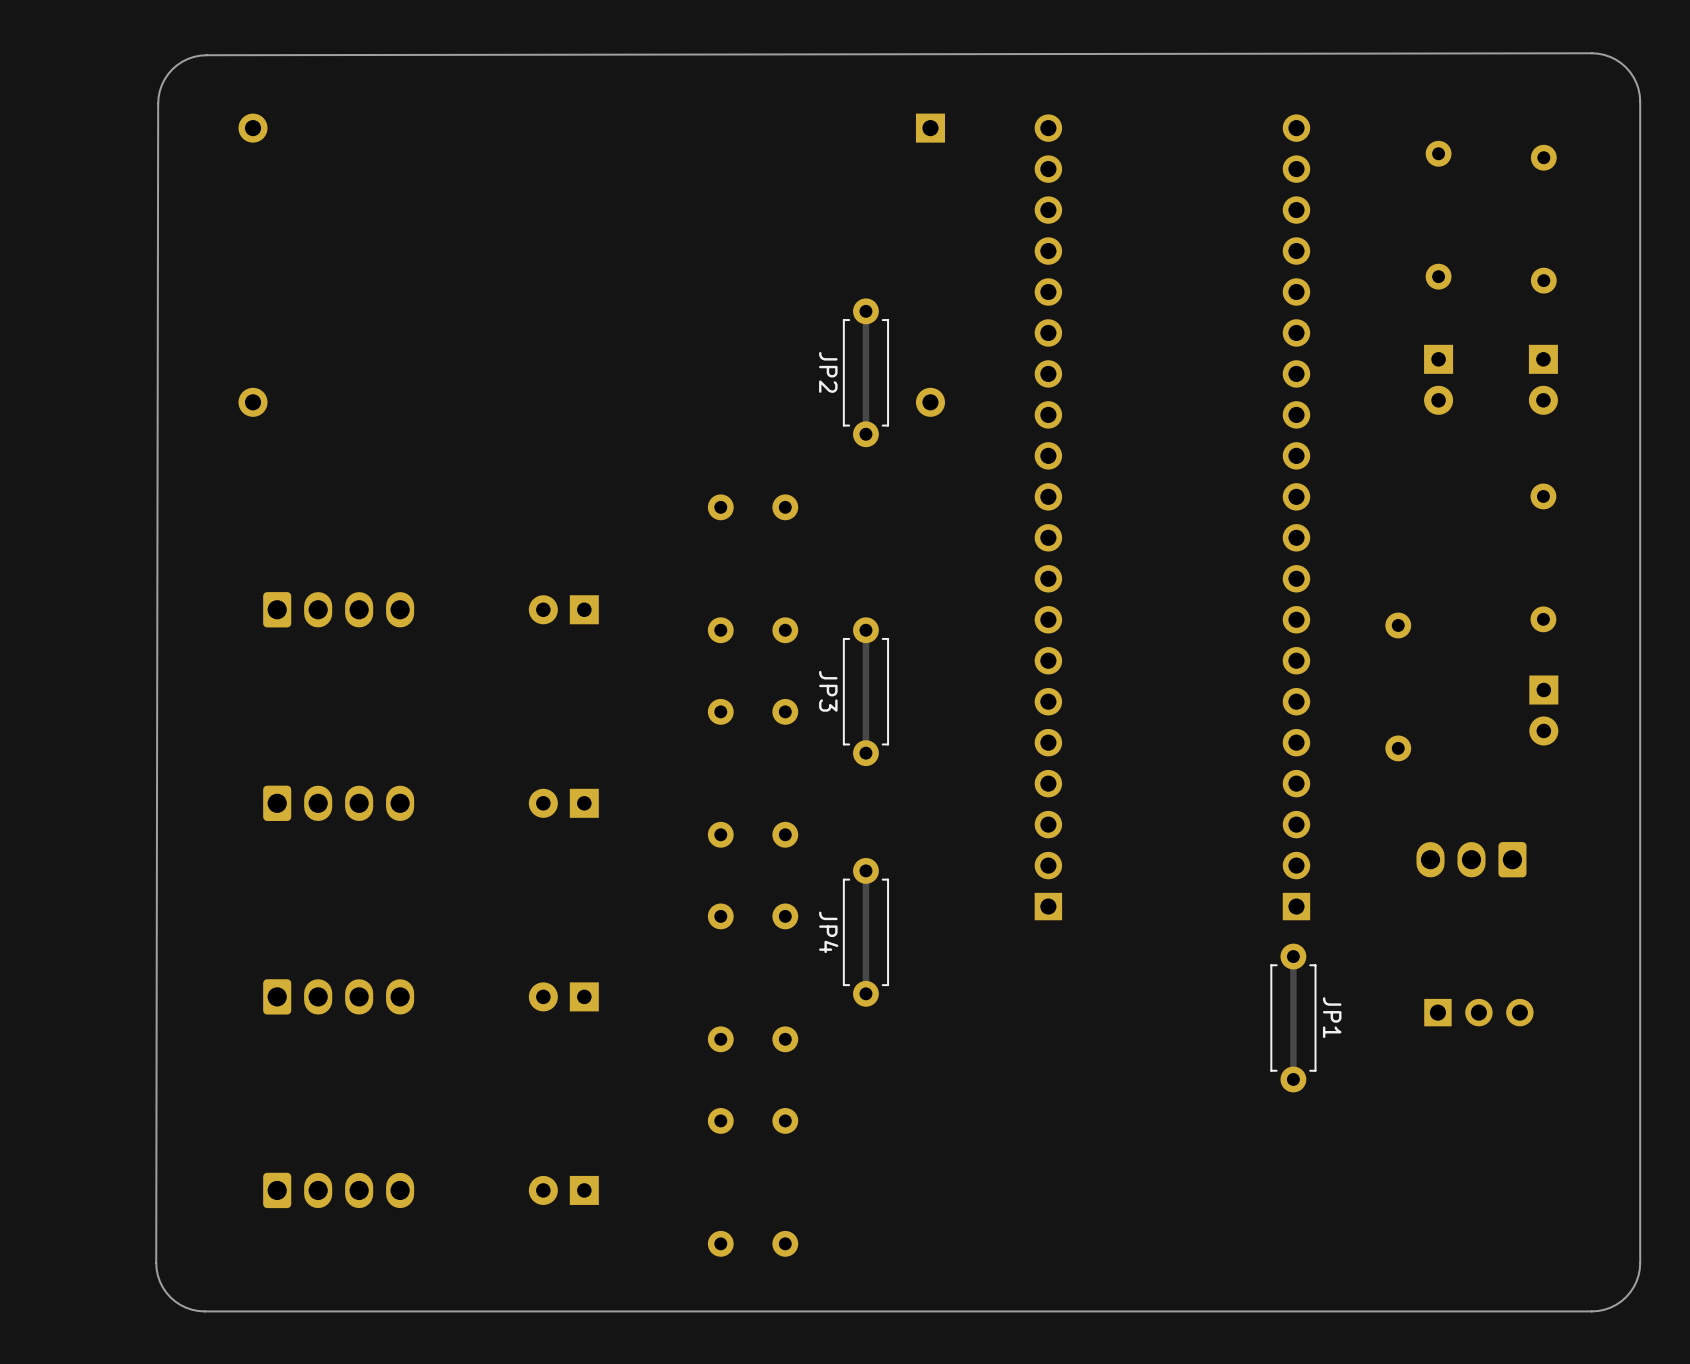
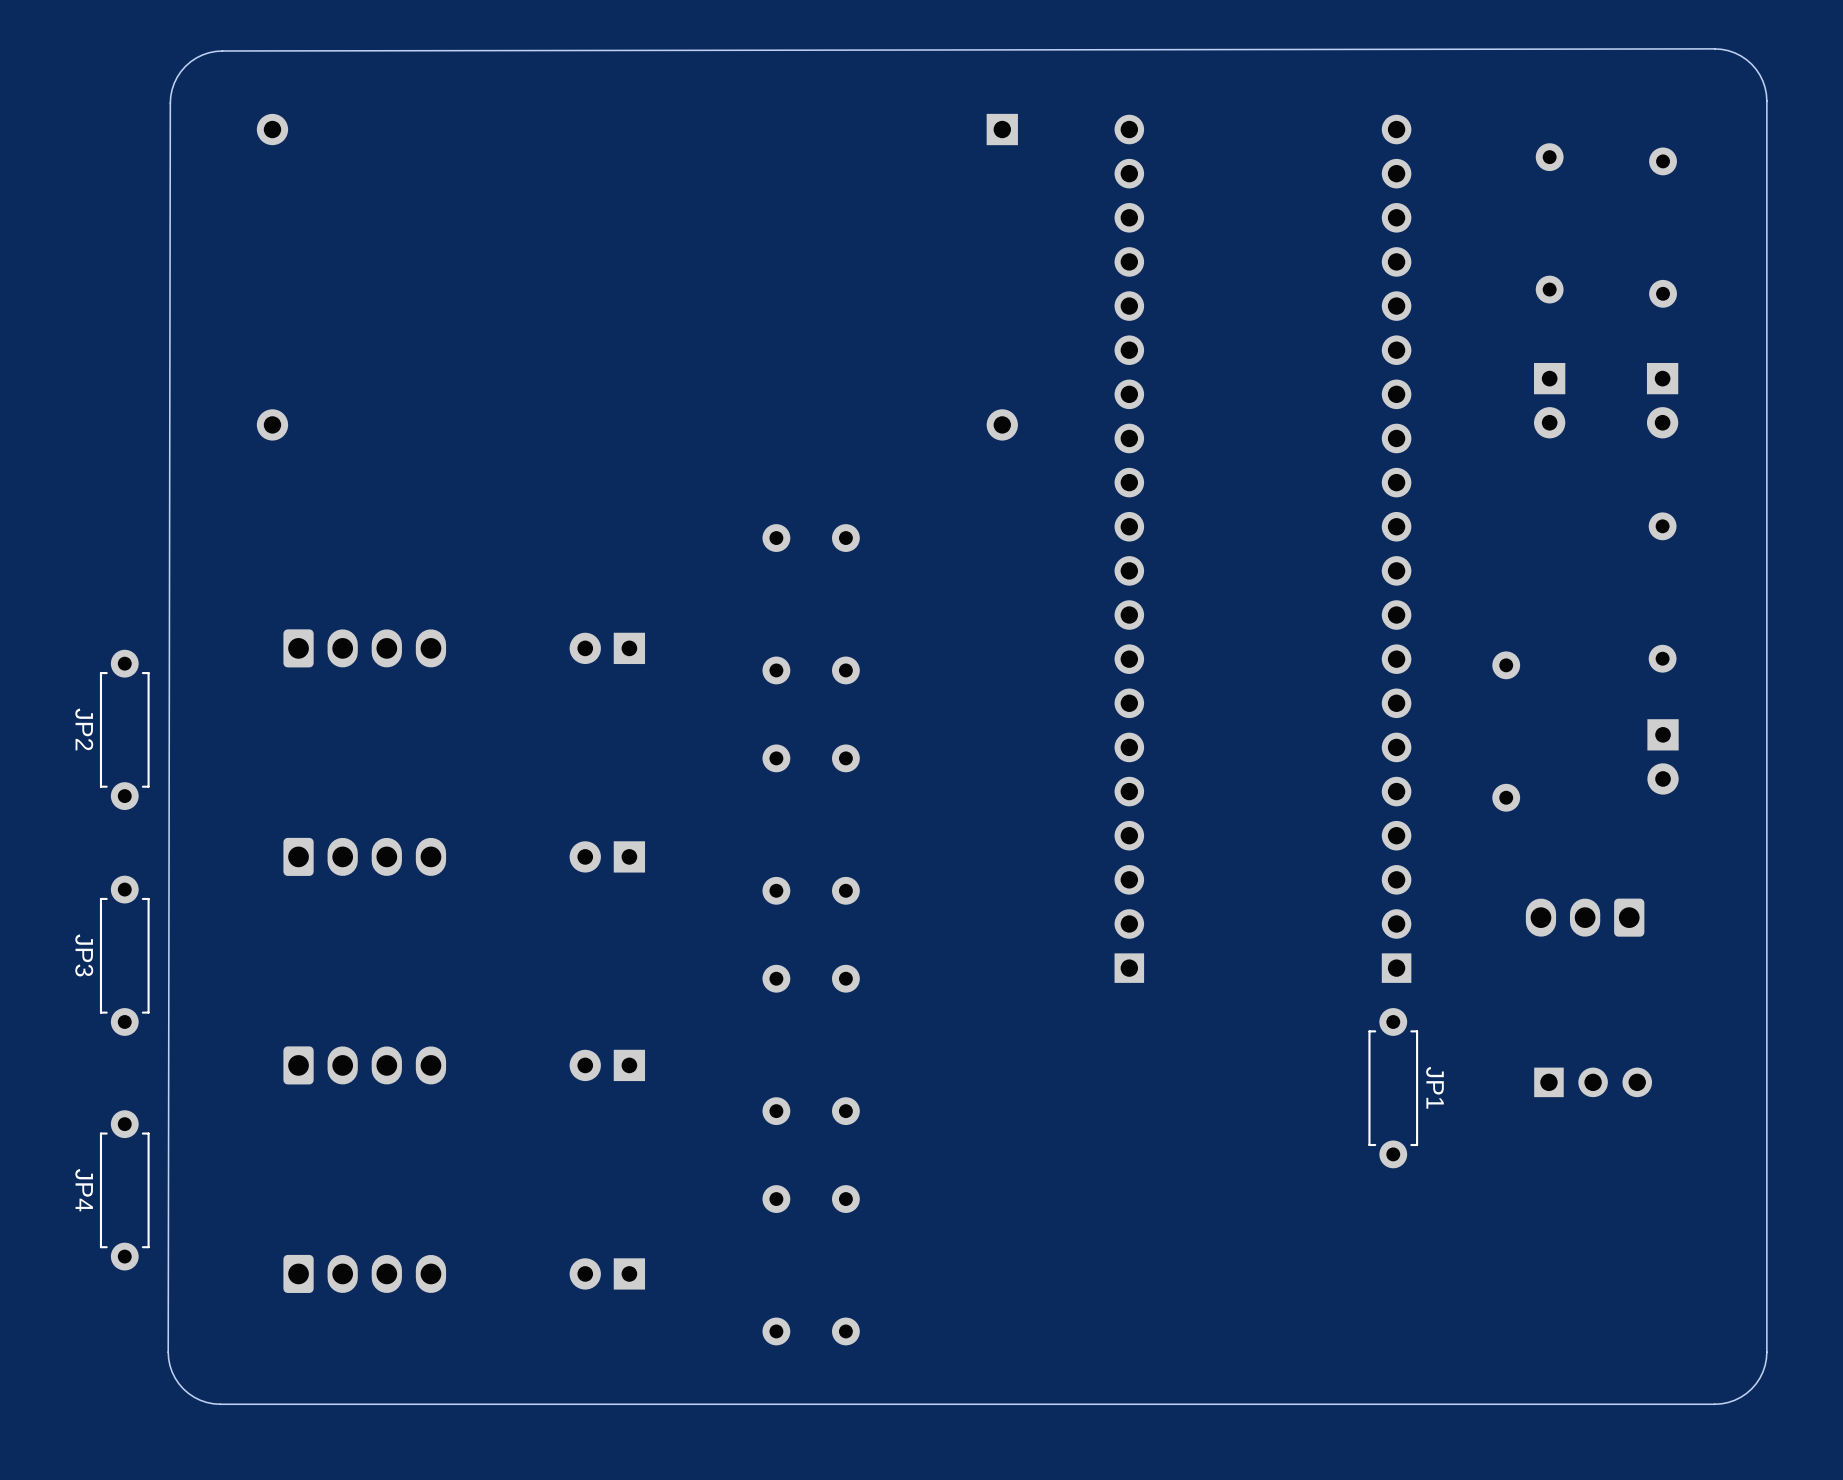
track: (865, 311) (865, 434) -> none
JP2 position: (865, 372) -> (124, 729)
track: (865, 630) (865, 753) -> none
JP3 position: (865, 691) -> (124, 955)
track: (865, 870) (865, 993) -> none
JP4 position: (865, 932) -> (124, 1190)
track: (1293, 956) (1293, 1079) -> none

